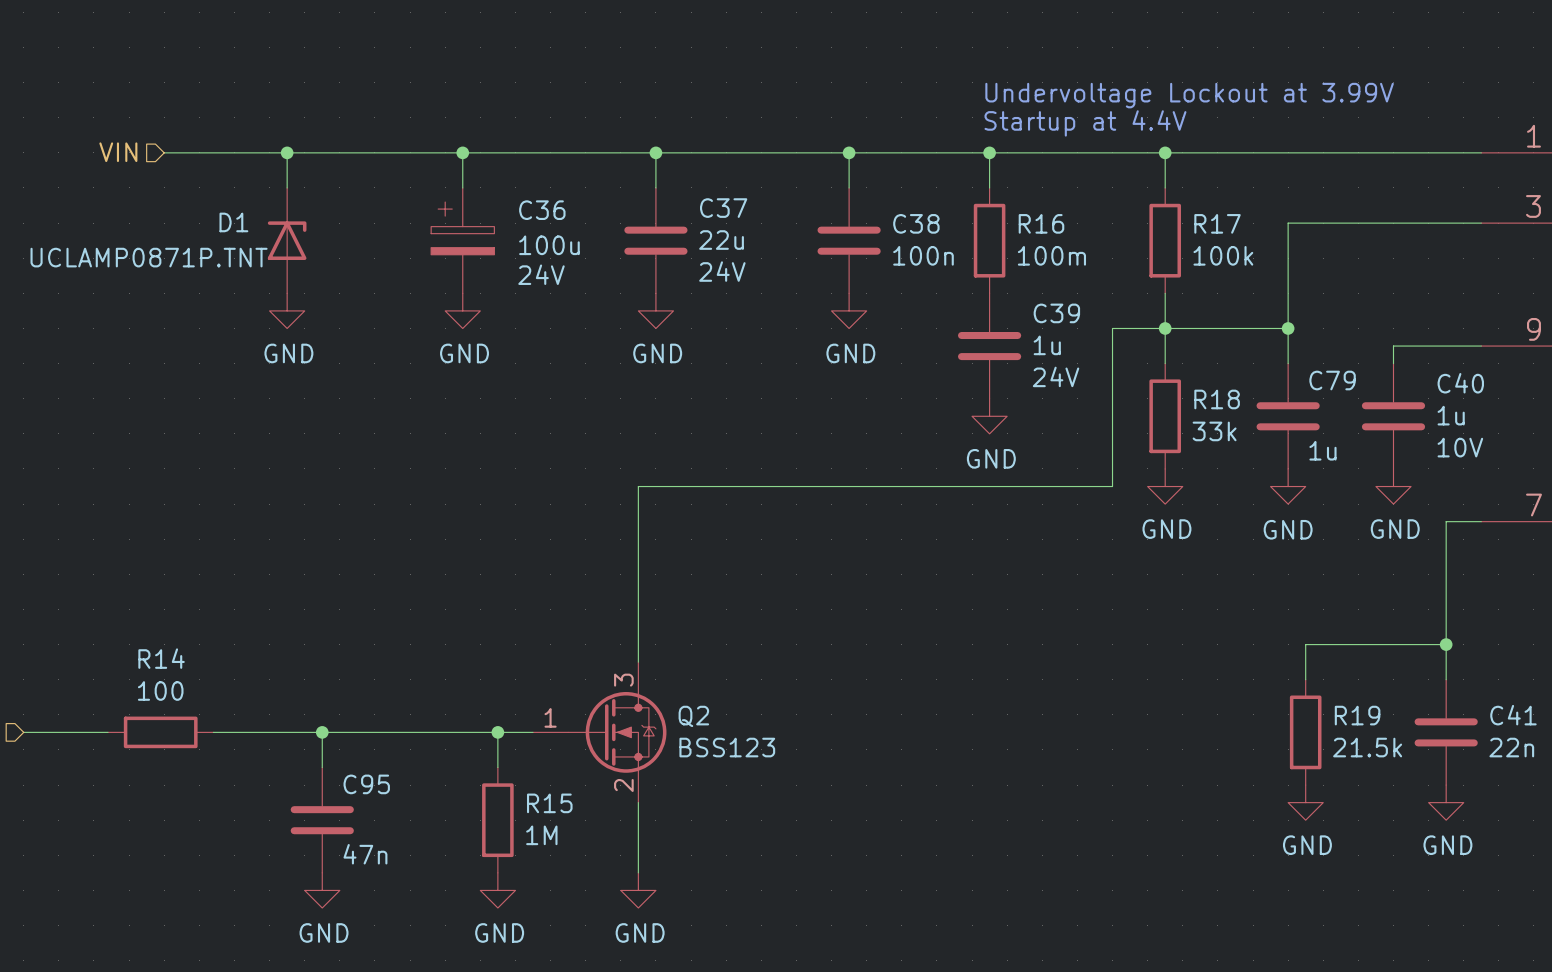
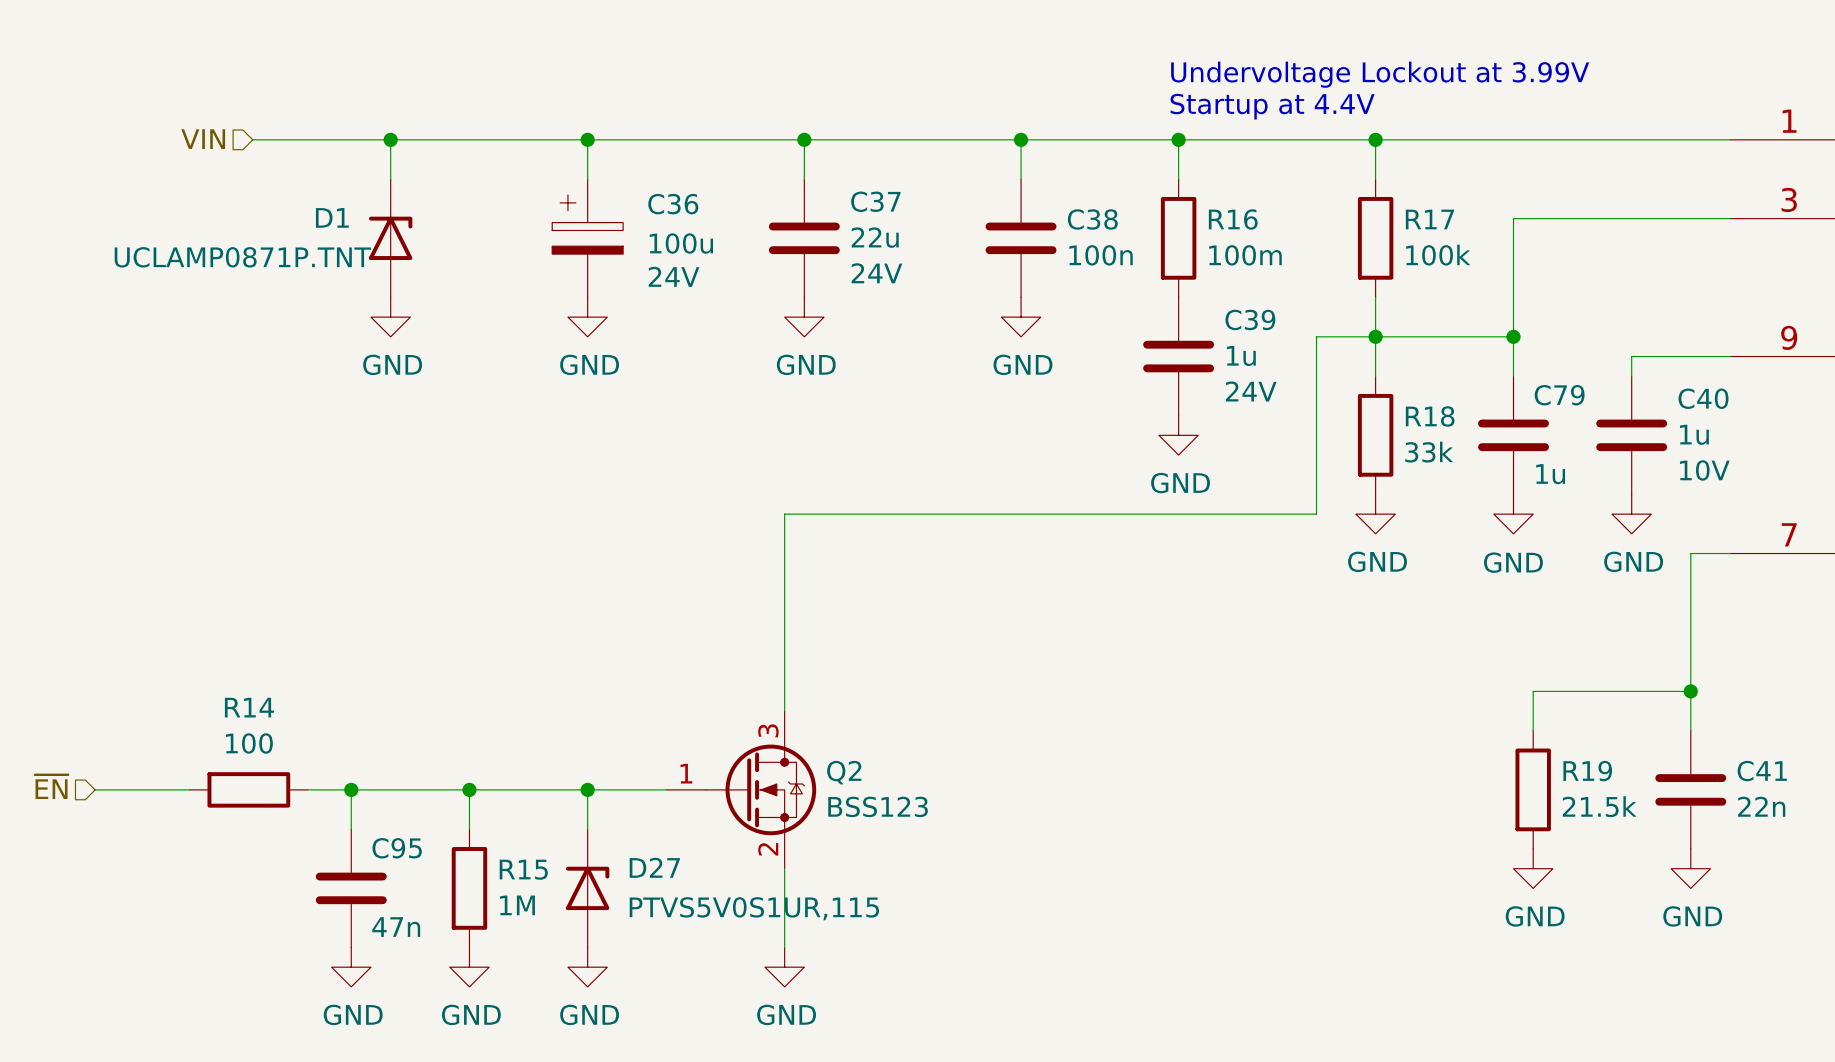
wire: none -> (351, 789) (351, 829)
junction: none -> (351, 789)
wire: (322, 732) (322, 767) -> (469, 789) (469, 829)
junction: (322, 732) -> none
junction: none -> (469, 789)
wire: (497, 732) (497, 767) -> (587, 789) (587, 829)
junction position: (497, 732) -> (587, 789)
C95 position: (322, 820) -> (351, 888)
D27: none -> PTVS5V0S1UR,115 (587, 888)
R15 position: (497, 820) -> (469, 888)
power symbol: none -> GND (351, 967)
power symbol: GND (322, 890) -> none
power symbol: none -> GND (469, 967)
power symbol position: GND (497, 890) -> GND (587, 967)

